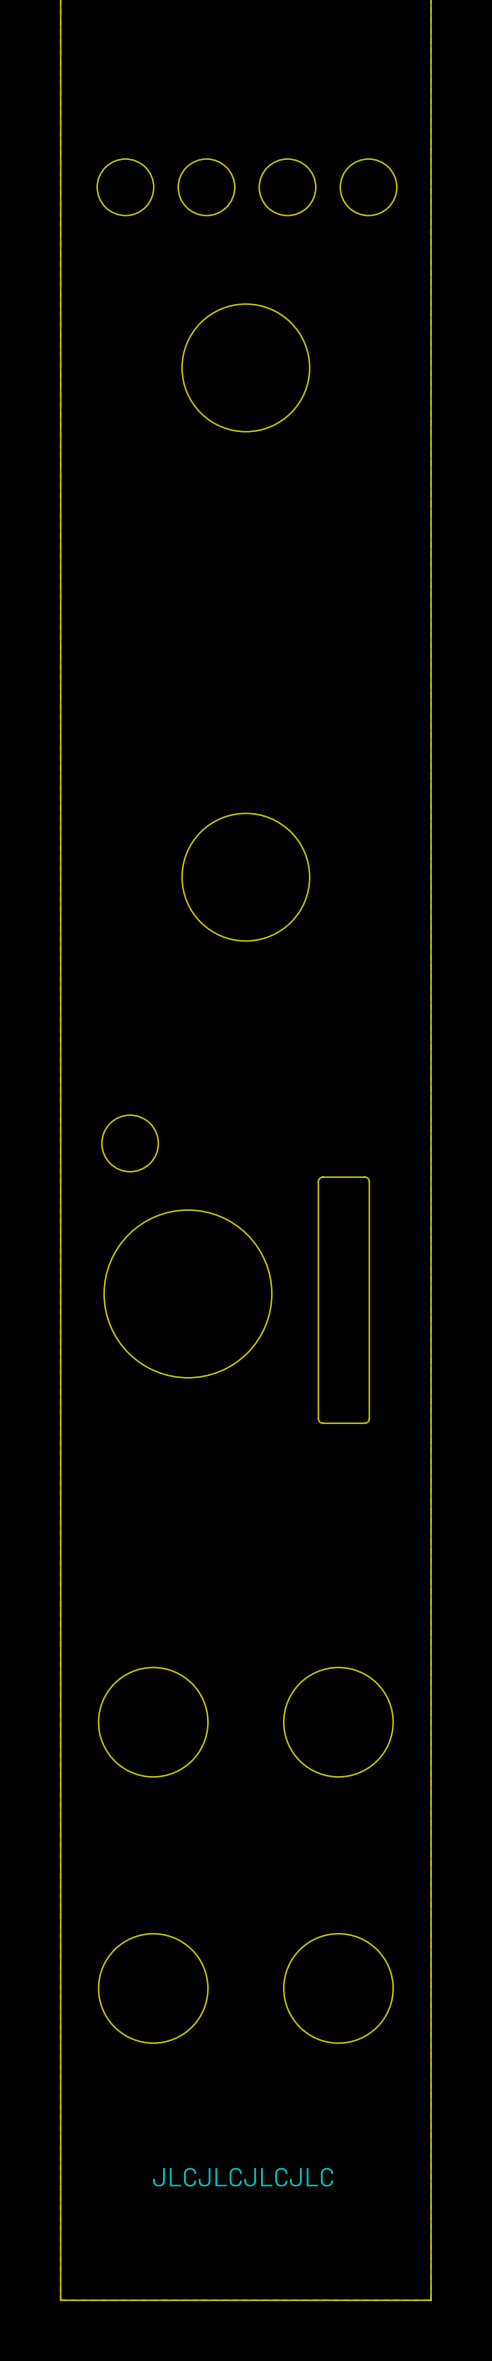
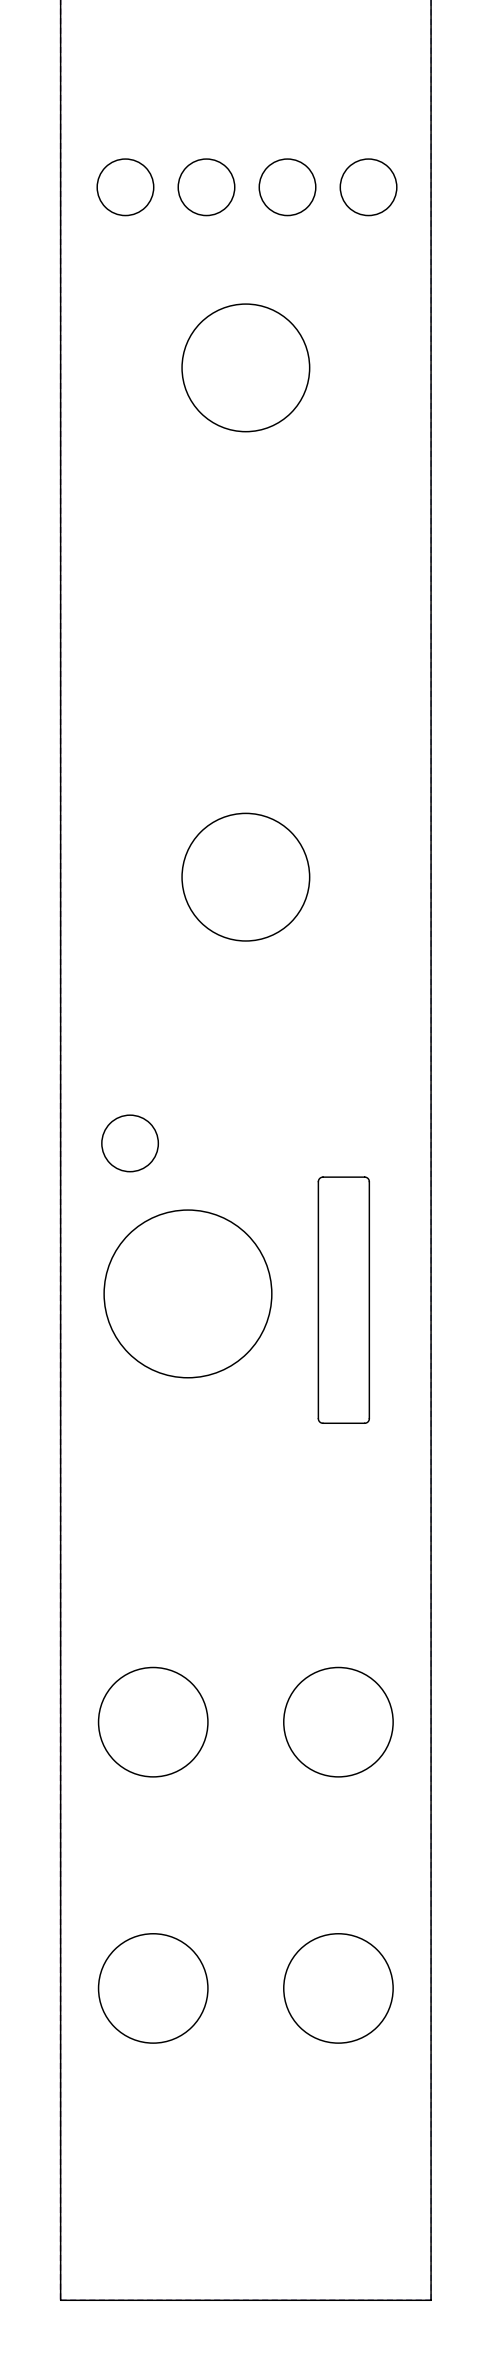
text: JLCJLCJLCJLC (243, 2177) -> none

